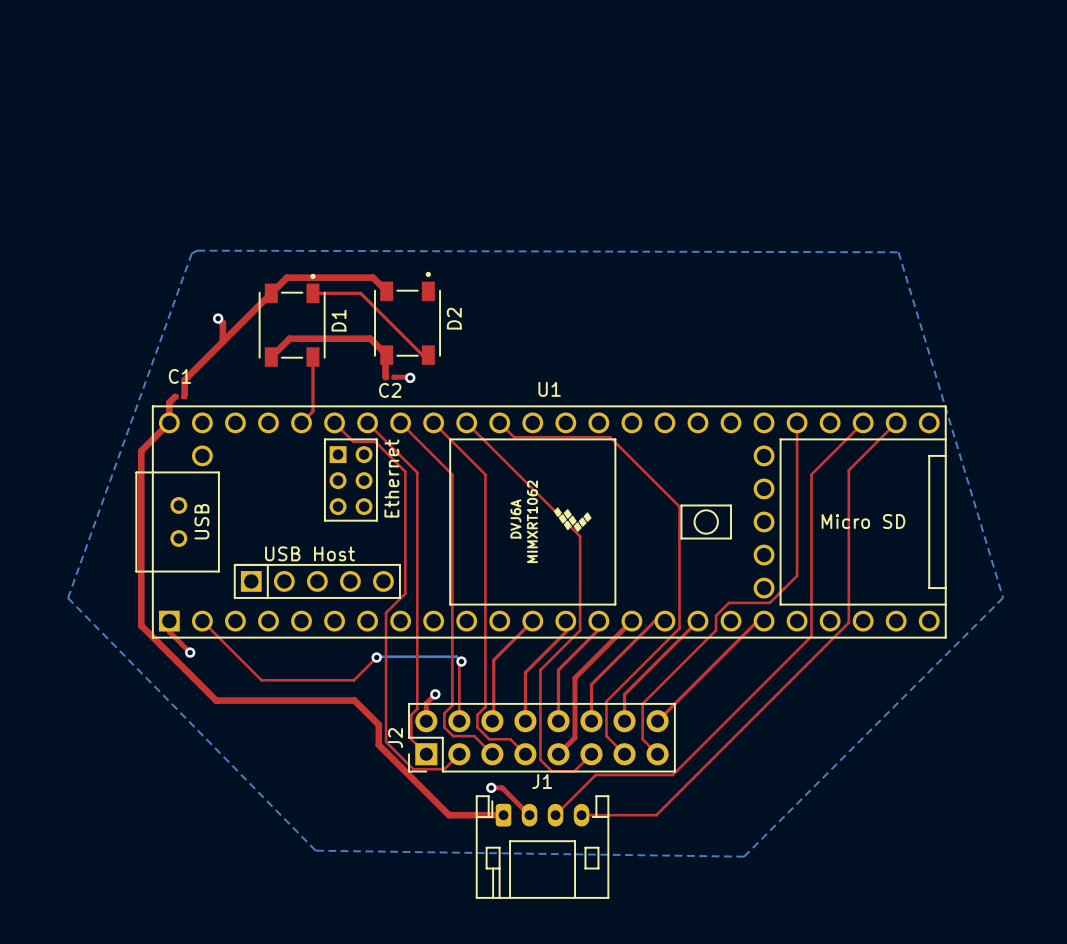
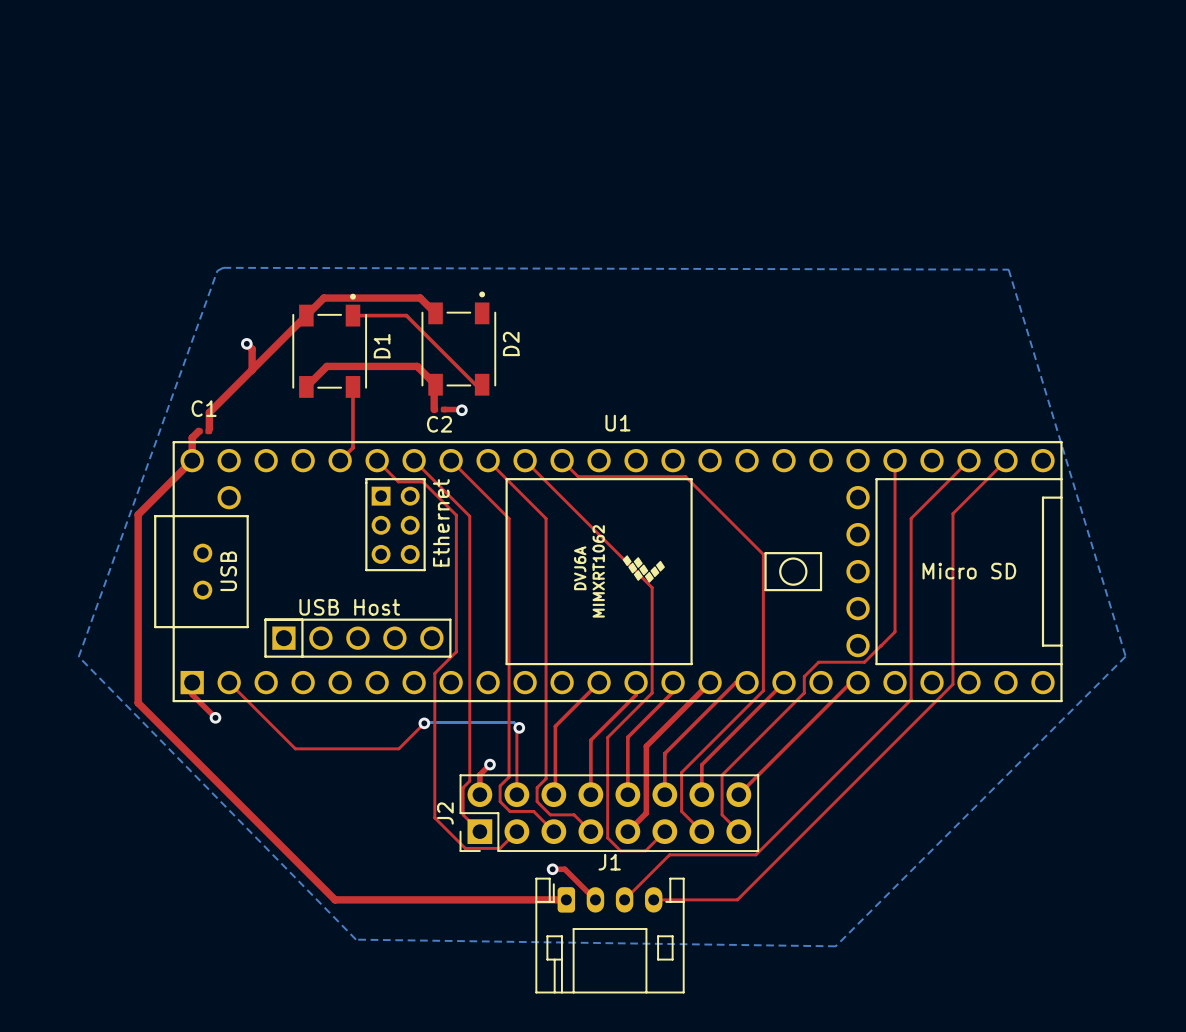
top track: (141, 450) (141, 625) (216, 700) (354, 700) (378, 724) (378, 744) (449, 815) -> (160, 492) (138, 514) (138, 702) (335, 899) (505, 899)

